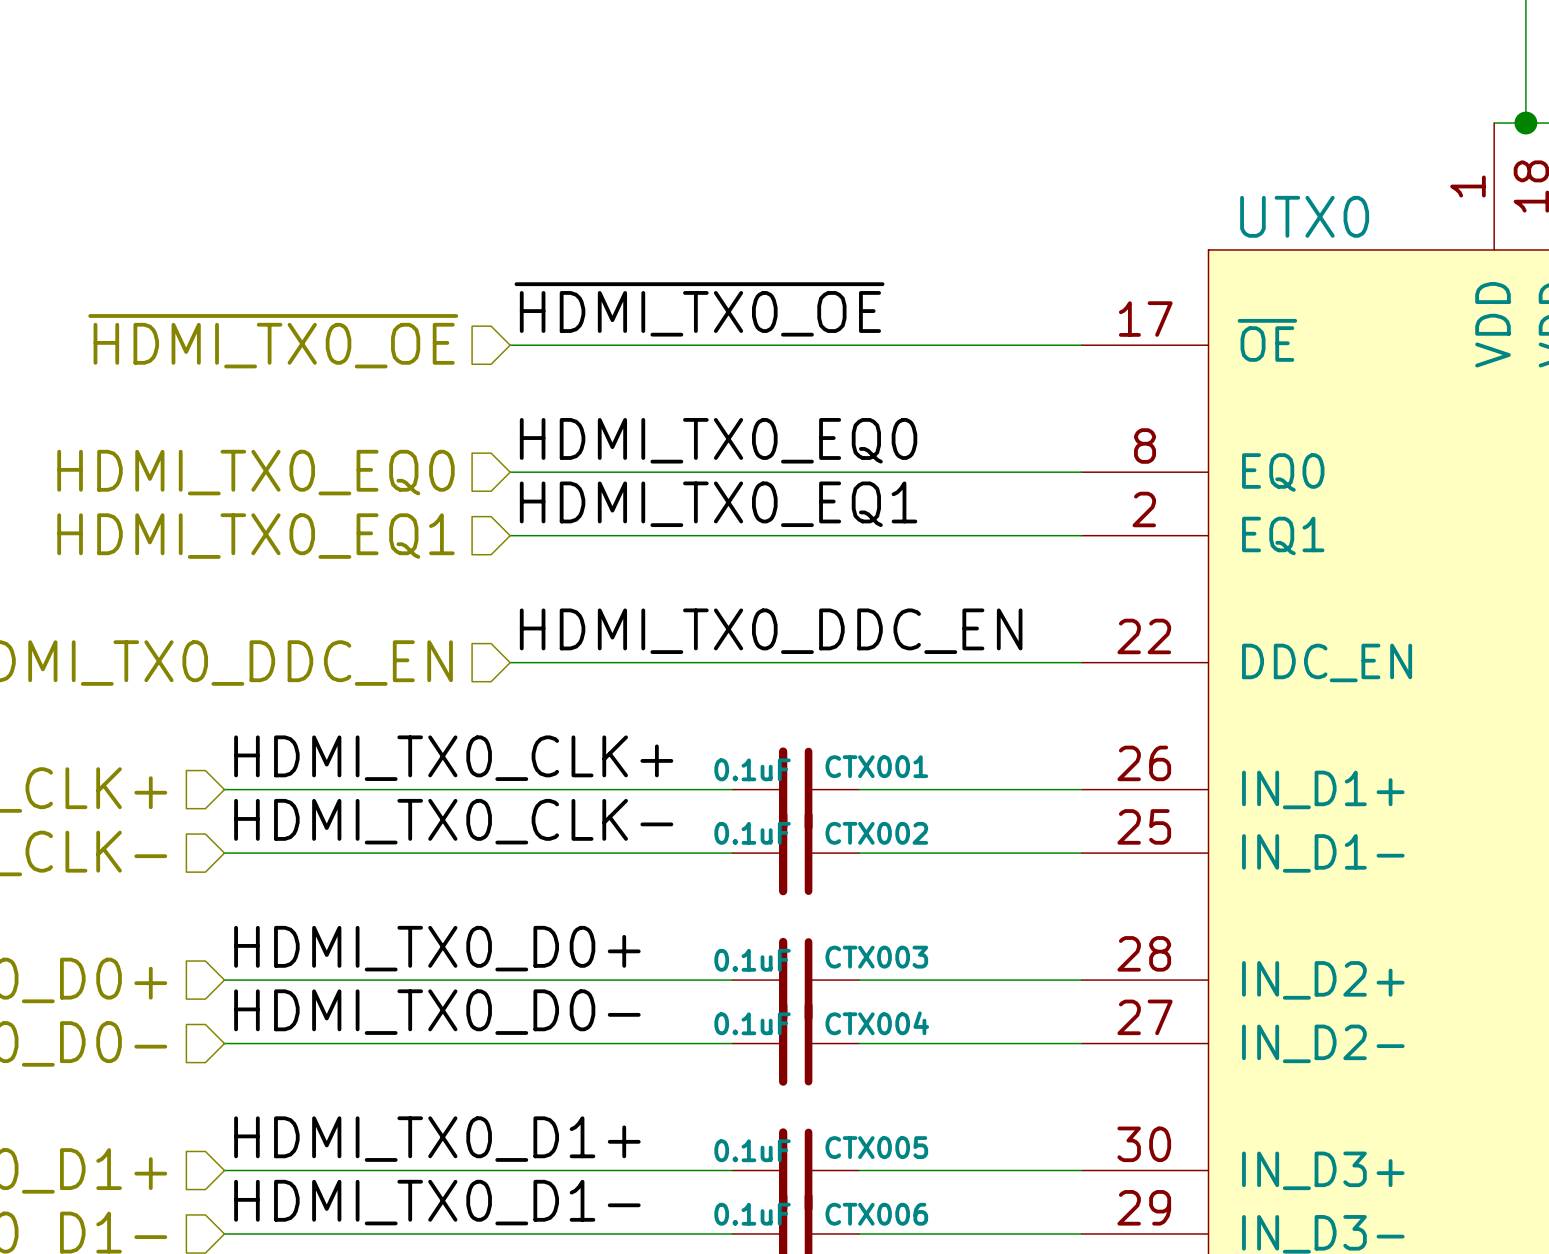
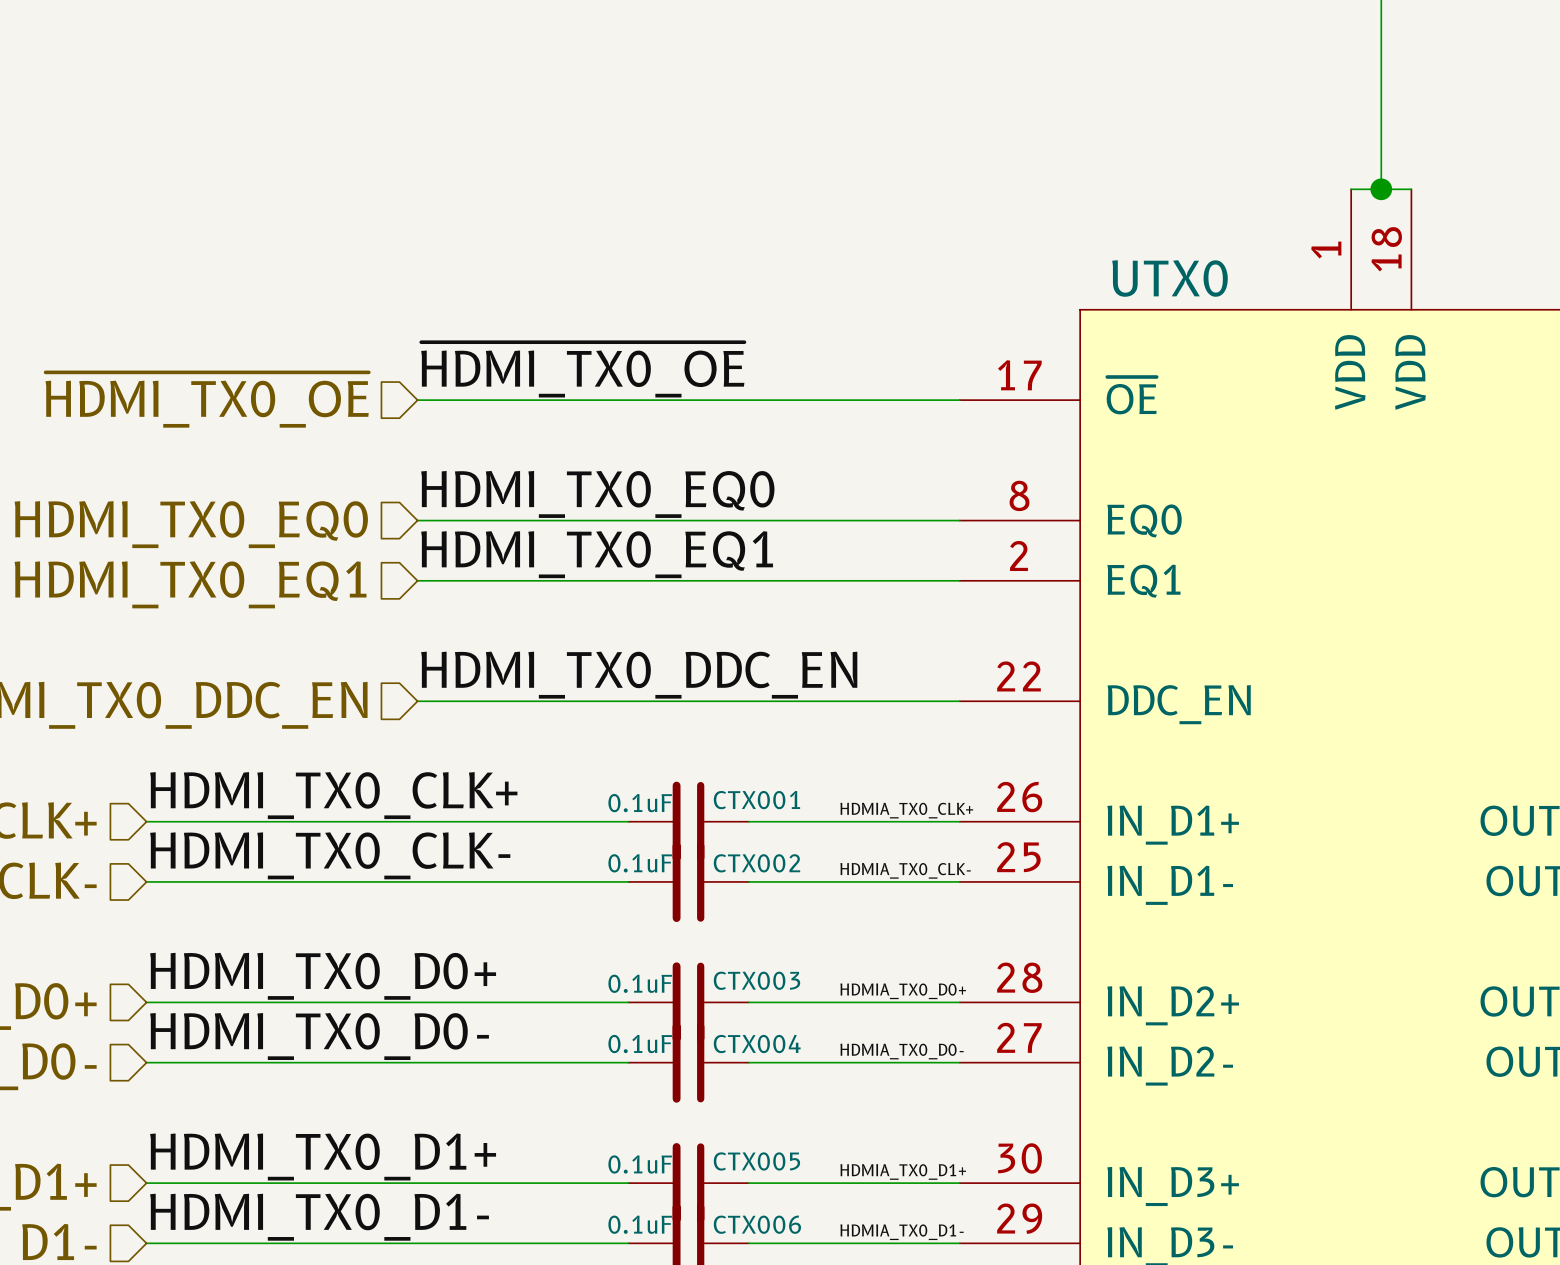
label: none -> HDMIA_TX0_CLK+ (906, 810)
label: none -> HDMIA_TX0_CLK- (905, 870)
label: none -> HDMIA_TX0_D0+ (903, 991)
label: none -> HDMIA_TX0_D0- (902, 1051)
label: none -> HDMIA_TX0_D1+ (903, 1171)
label: none -> HDMIA_TX0_D1- (902, 1232)

